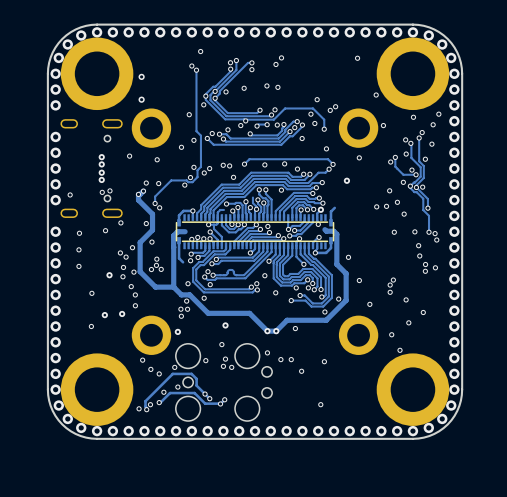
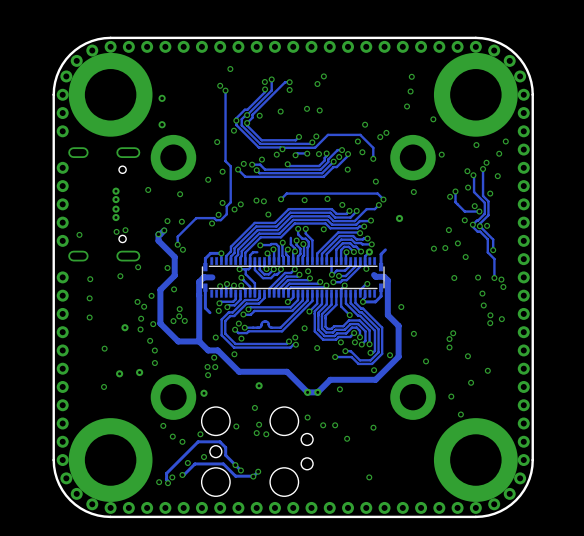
via: none -> (410, 91)
via: none -> (407, 106)

